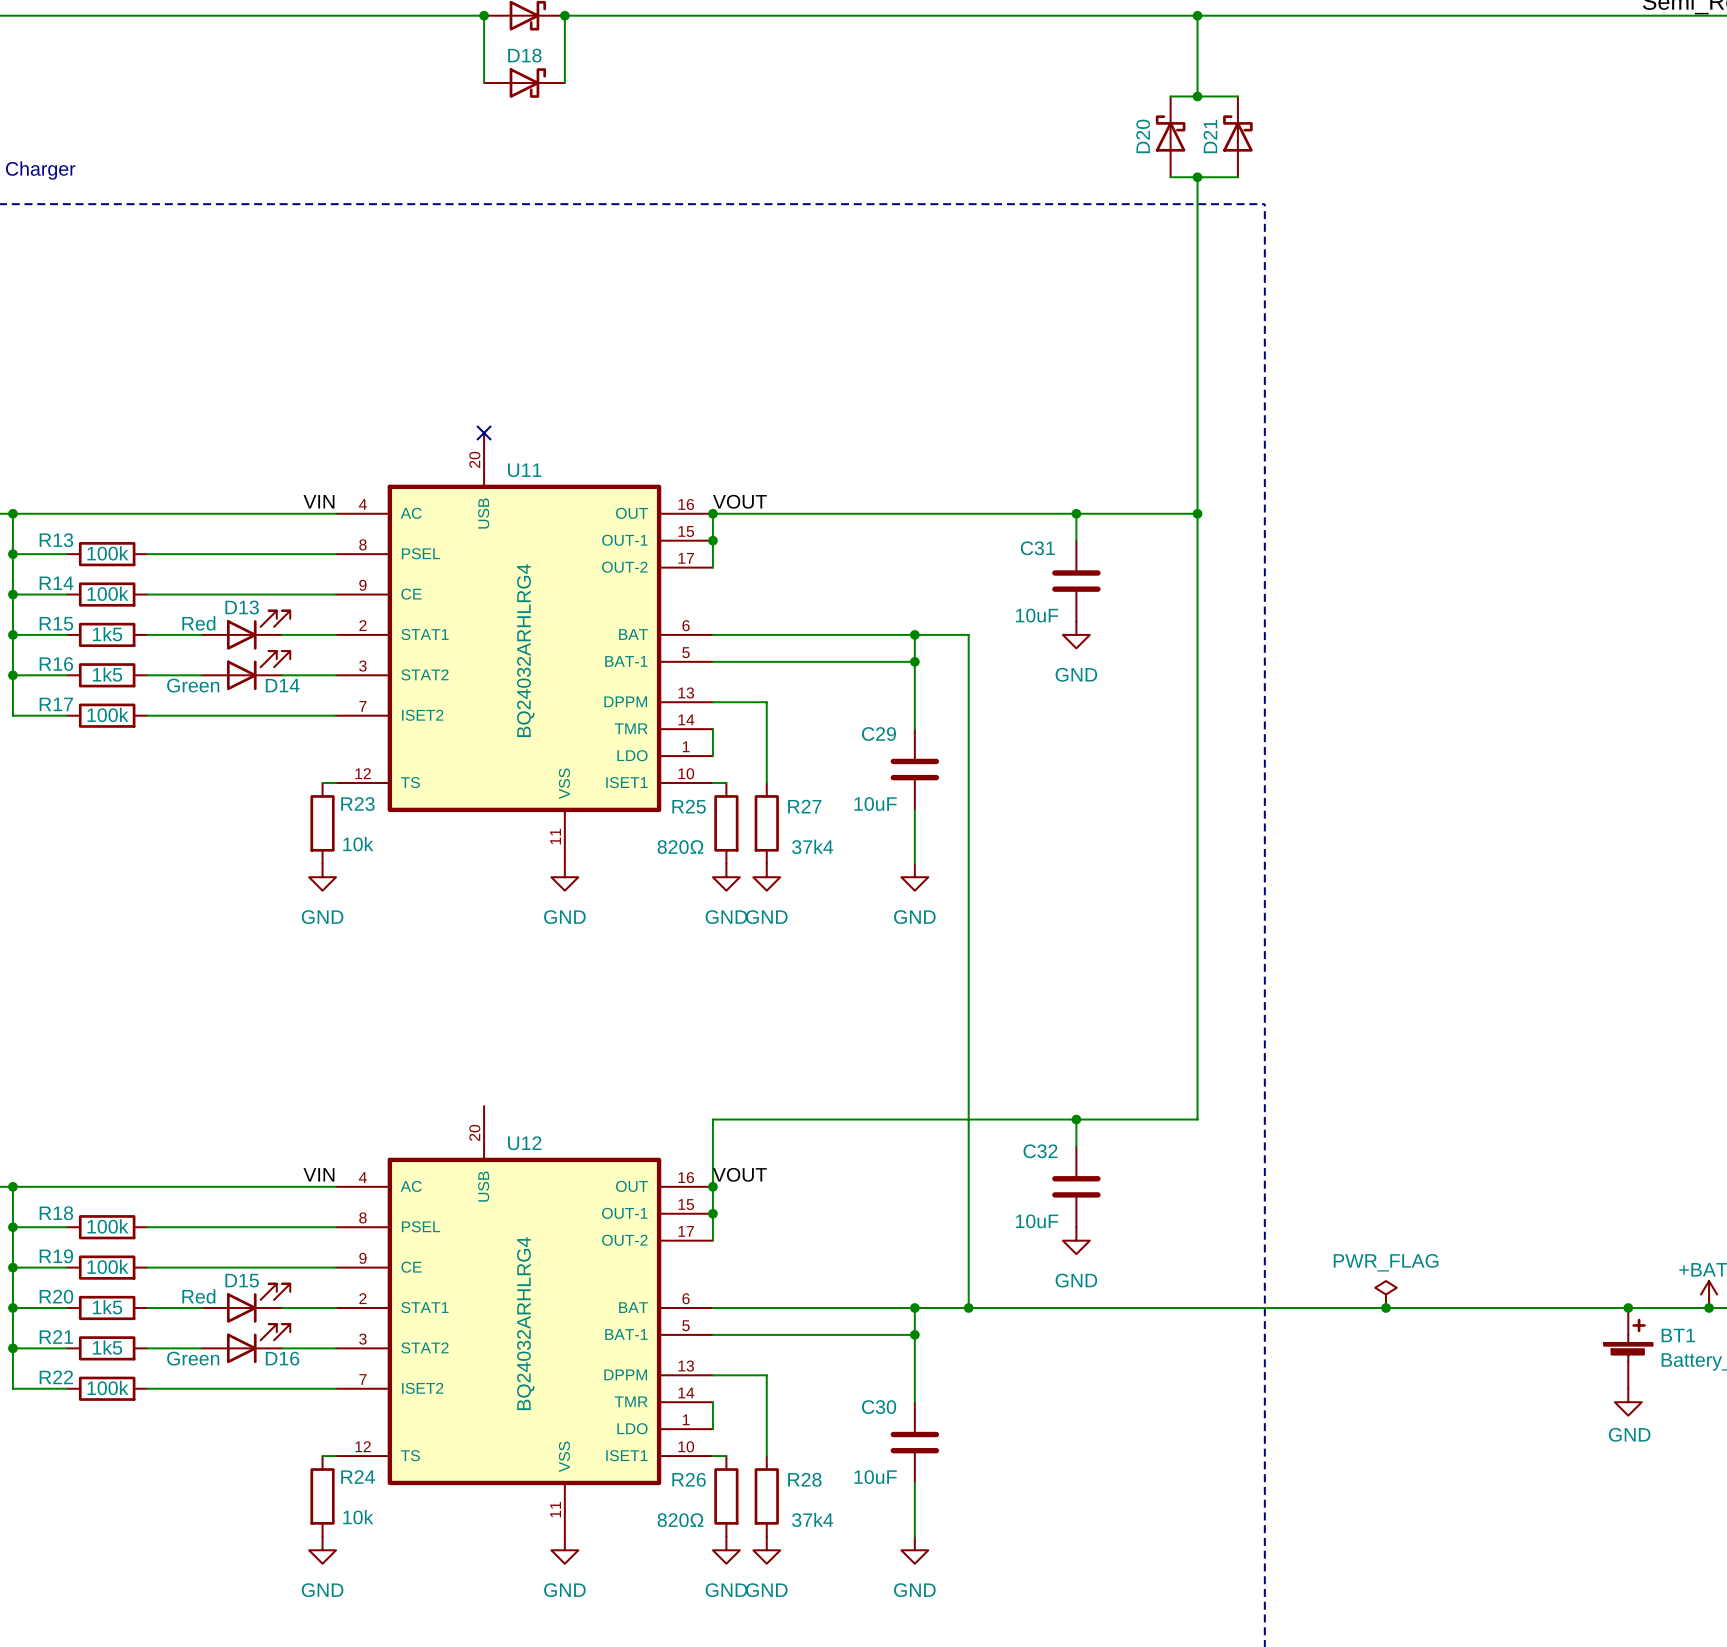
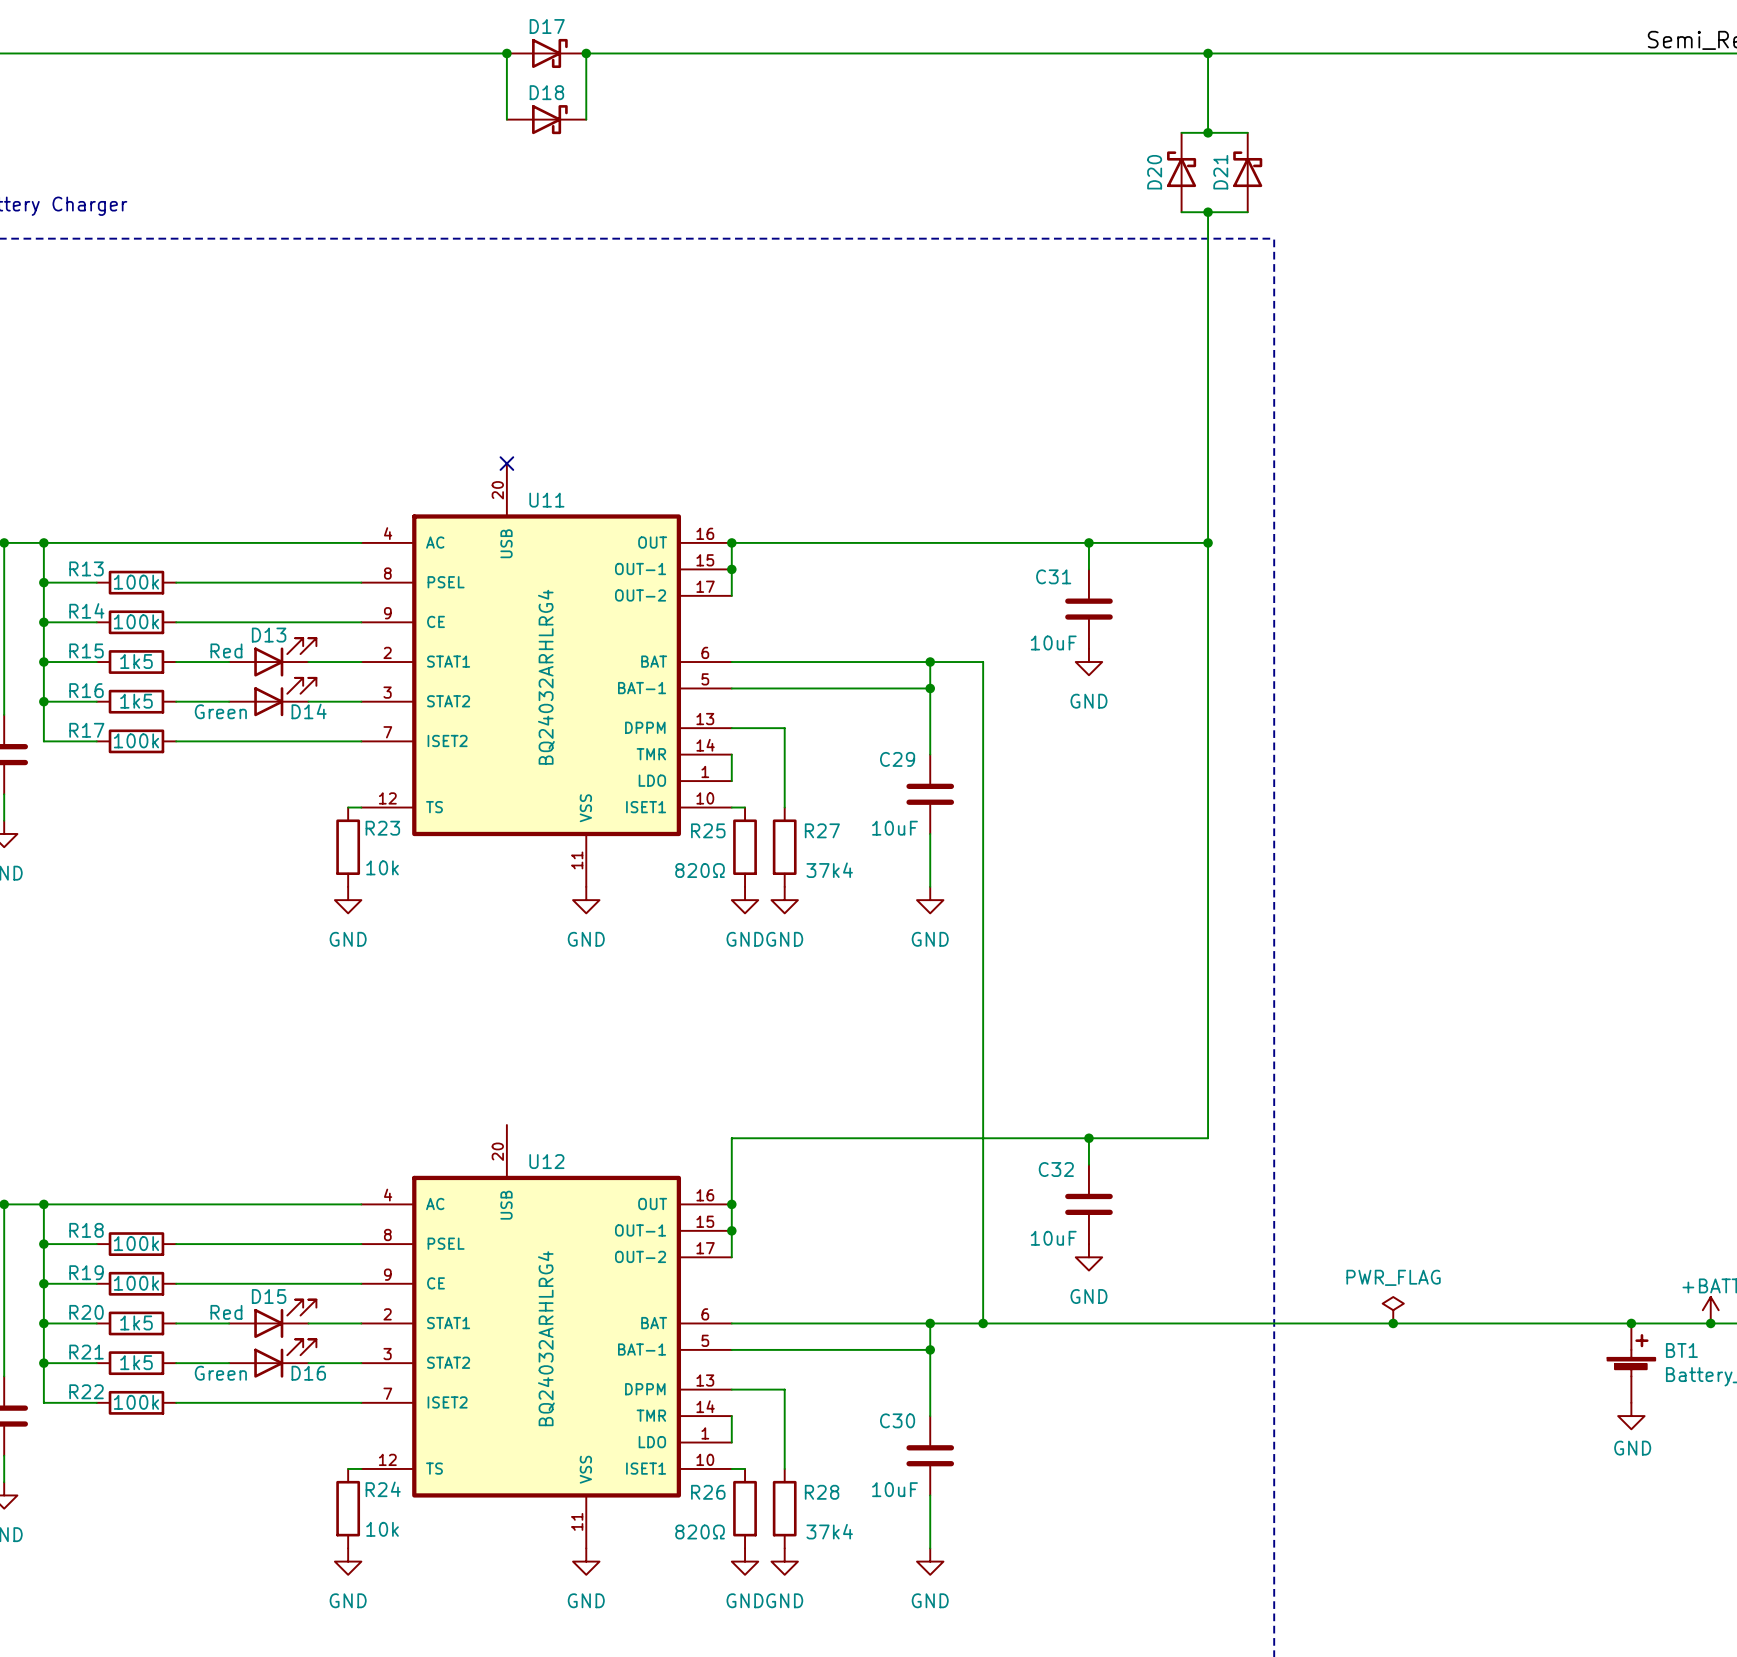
label: VIN (318, 501) -> none
label: VOUT (739, 501) -> none
label: VIN (318, 1174) -> none
label: VOUT (739, 1174) -> none

